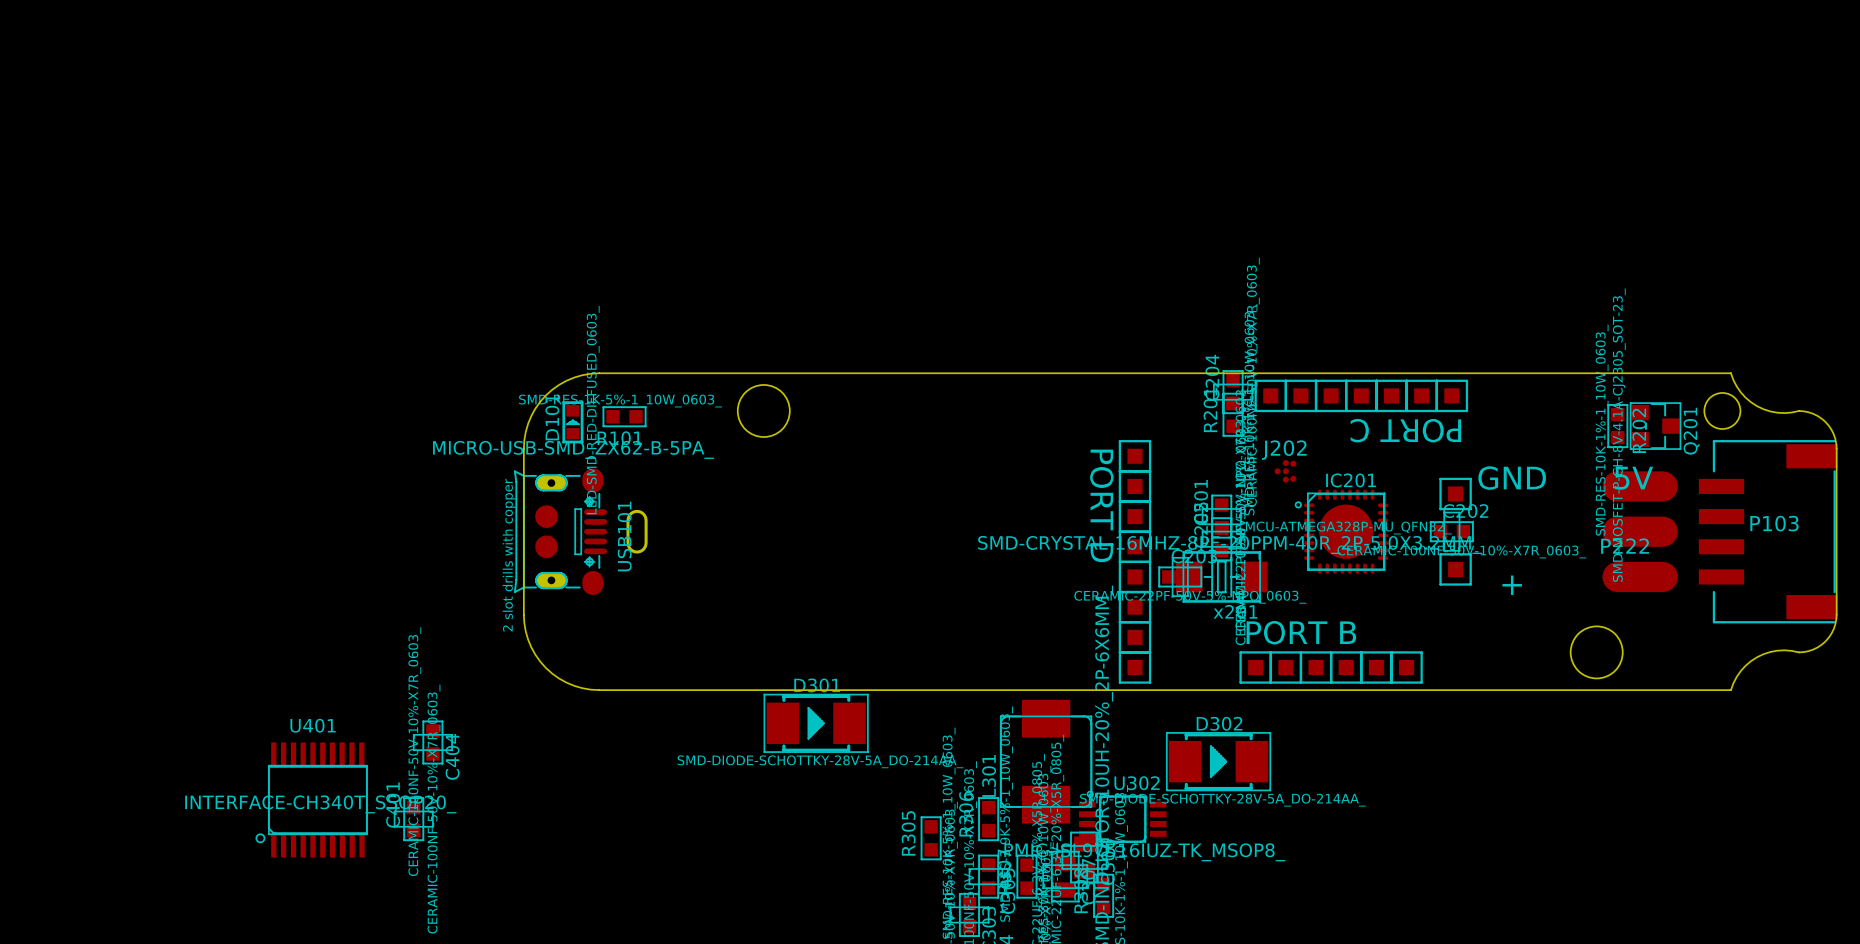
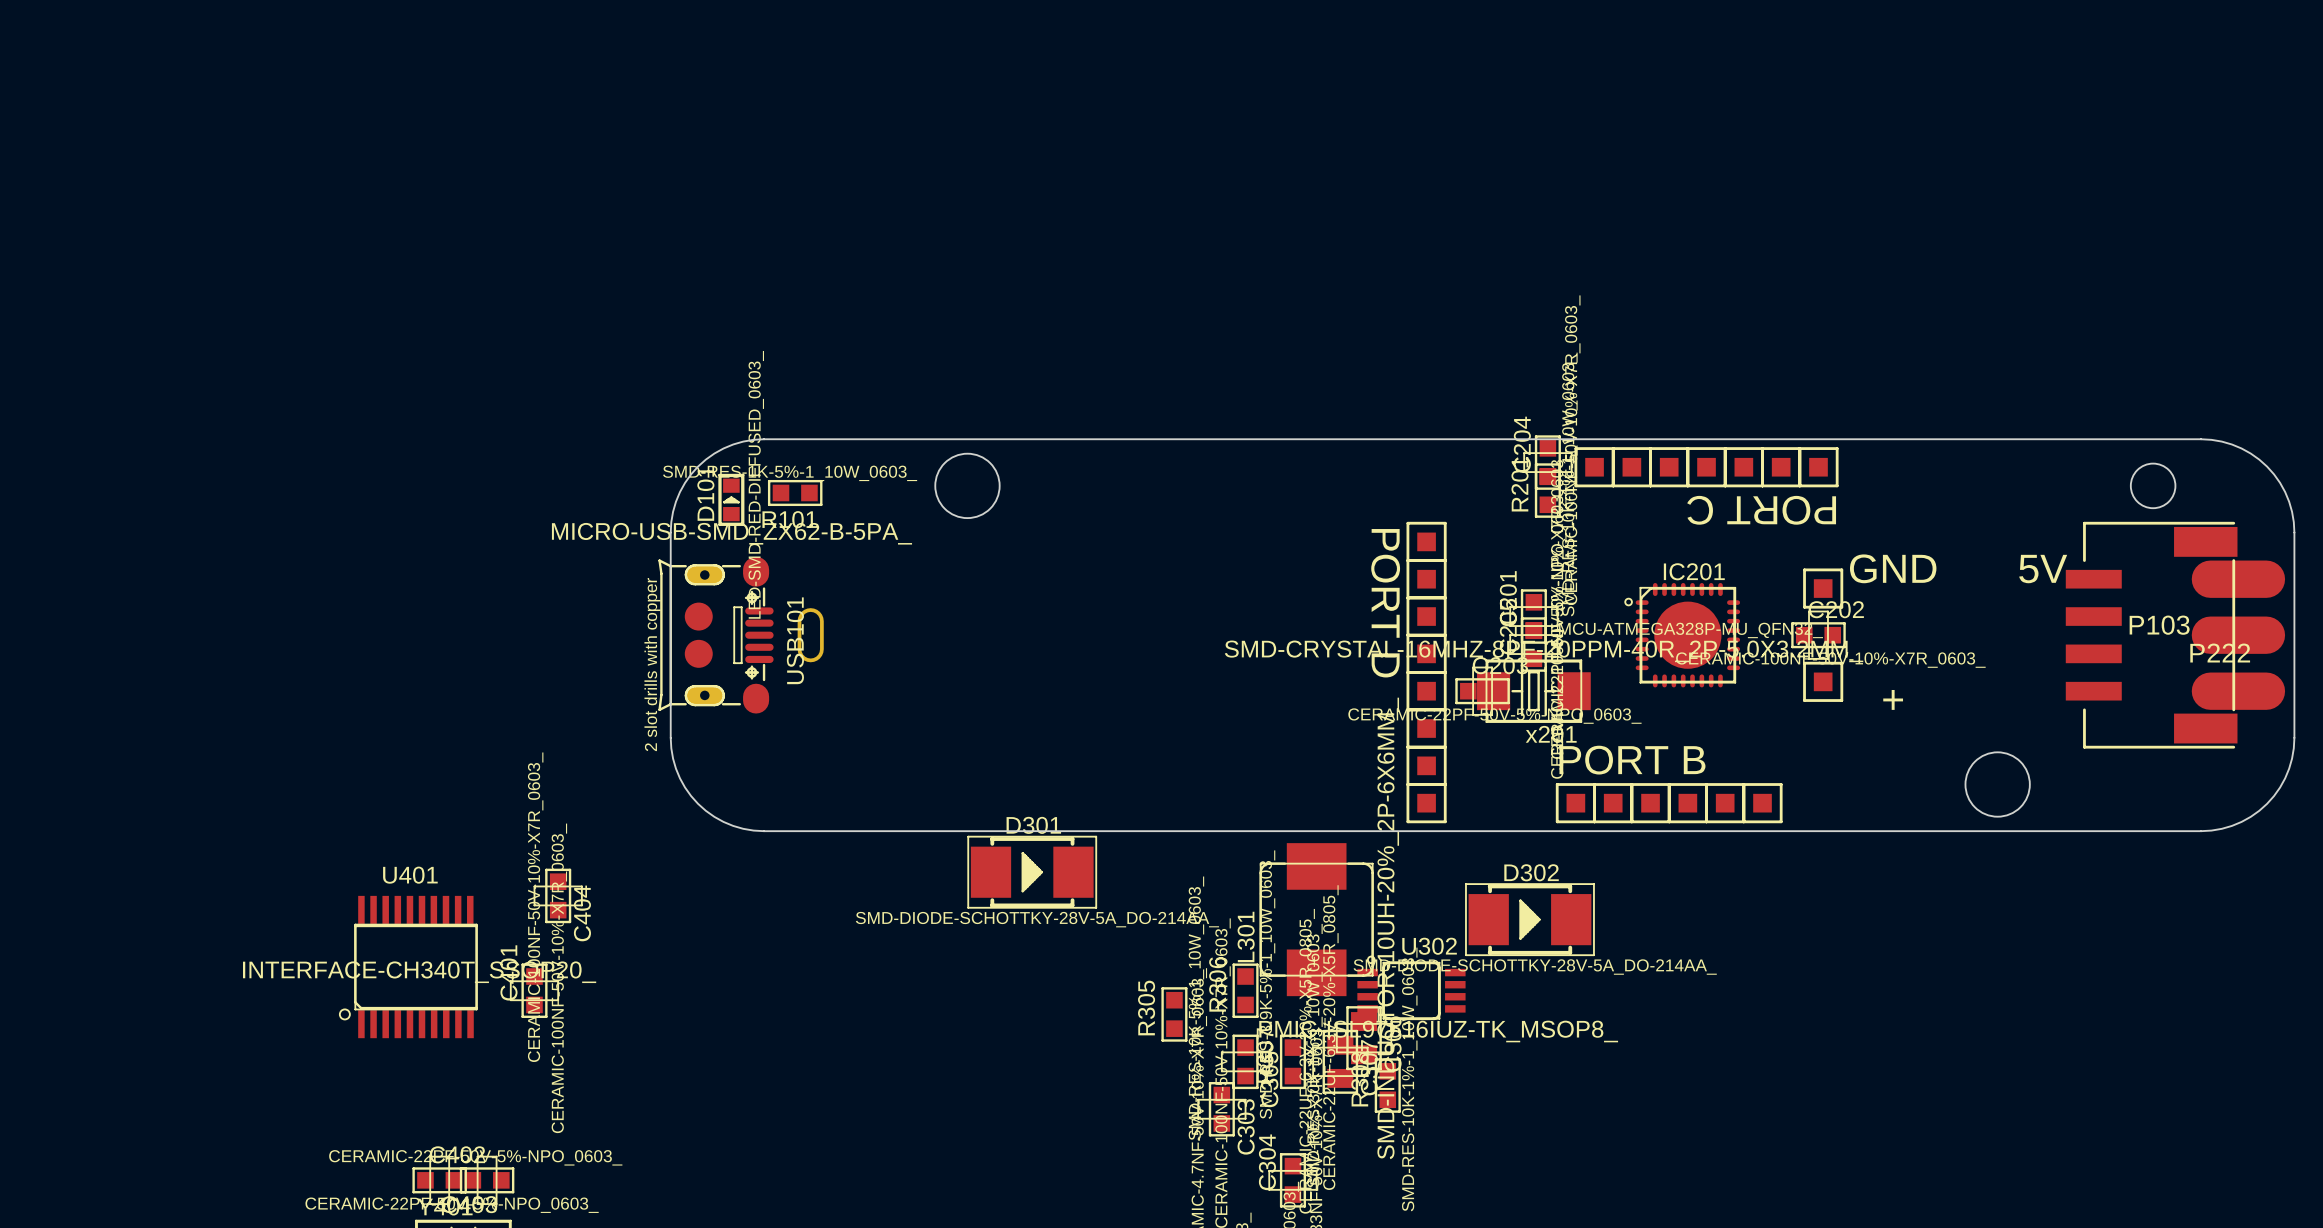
board edge: (1730, 373) (1740, 392) (1757, 406) (1777, 412) (1803, 411) (1821, 418) (1831, 429) (1836, 448) -> (2163, 439) (2201, 439) (2221, 441) (2241, 448) (2259, 459) (2274, 474) (2285, 492) (2292, 511) (2294, 532)
R202: SMD-RES-10K-1%-1_10W_0603_ (1617, 426) -> none
Q201: SMD-MOSFET-P-CH-8V-4.1A-CJ2305_SOT-23_ (1655, 426) -> none
J202: (1285, 471) -> none
P222 position: (1640, 531) -> (2238, 635)
P103 position: (1768, 531) -> (2151, 635)
board edge: (1836, 614) (1831, 633) (1821, 644) (1803, 652) (1777, 650) (1757, 657) (1740, 671) (1730, 690) -> (2294, 737) (2292, 758) (2285, 778) (2274, 796) (2259, 810) (2241, 821) (2221, 828) (2201, 831) (2163, 831)

